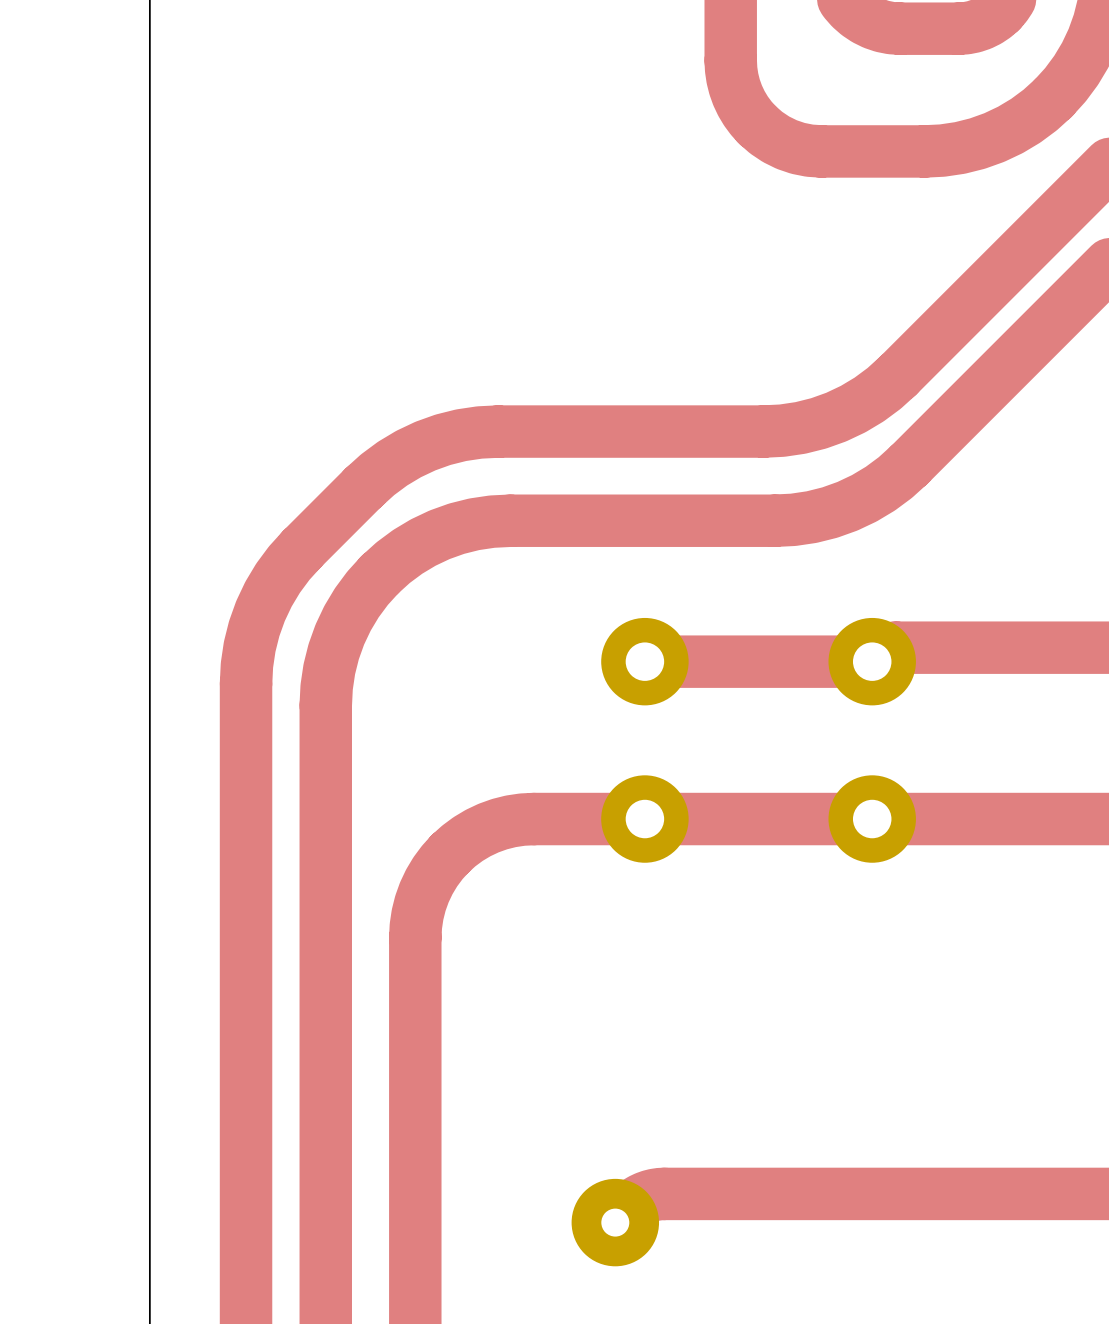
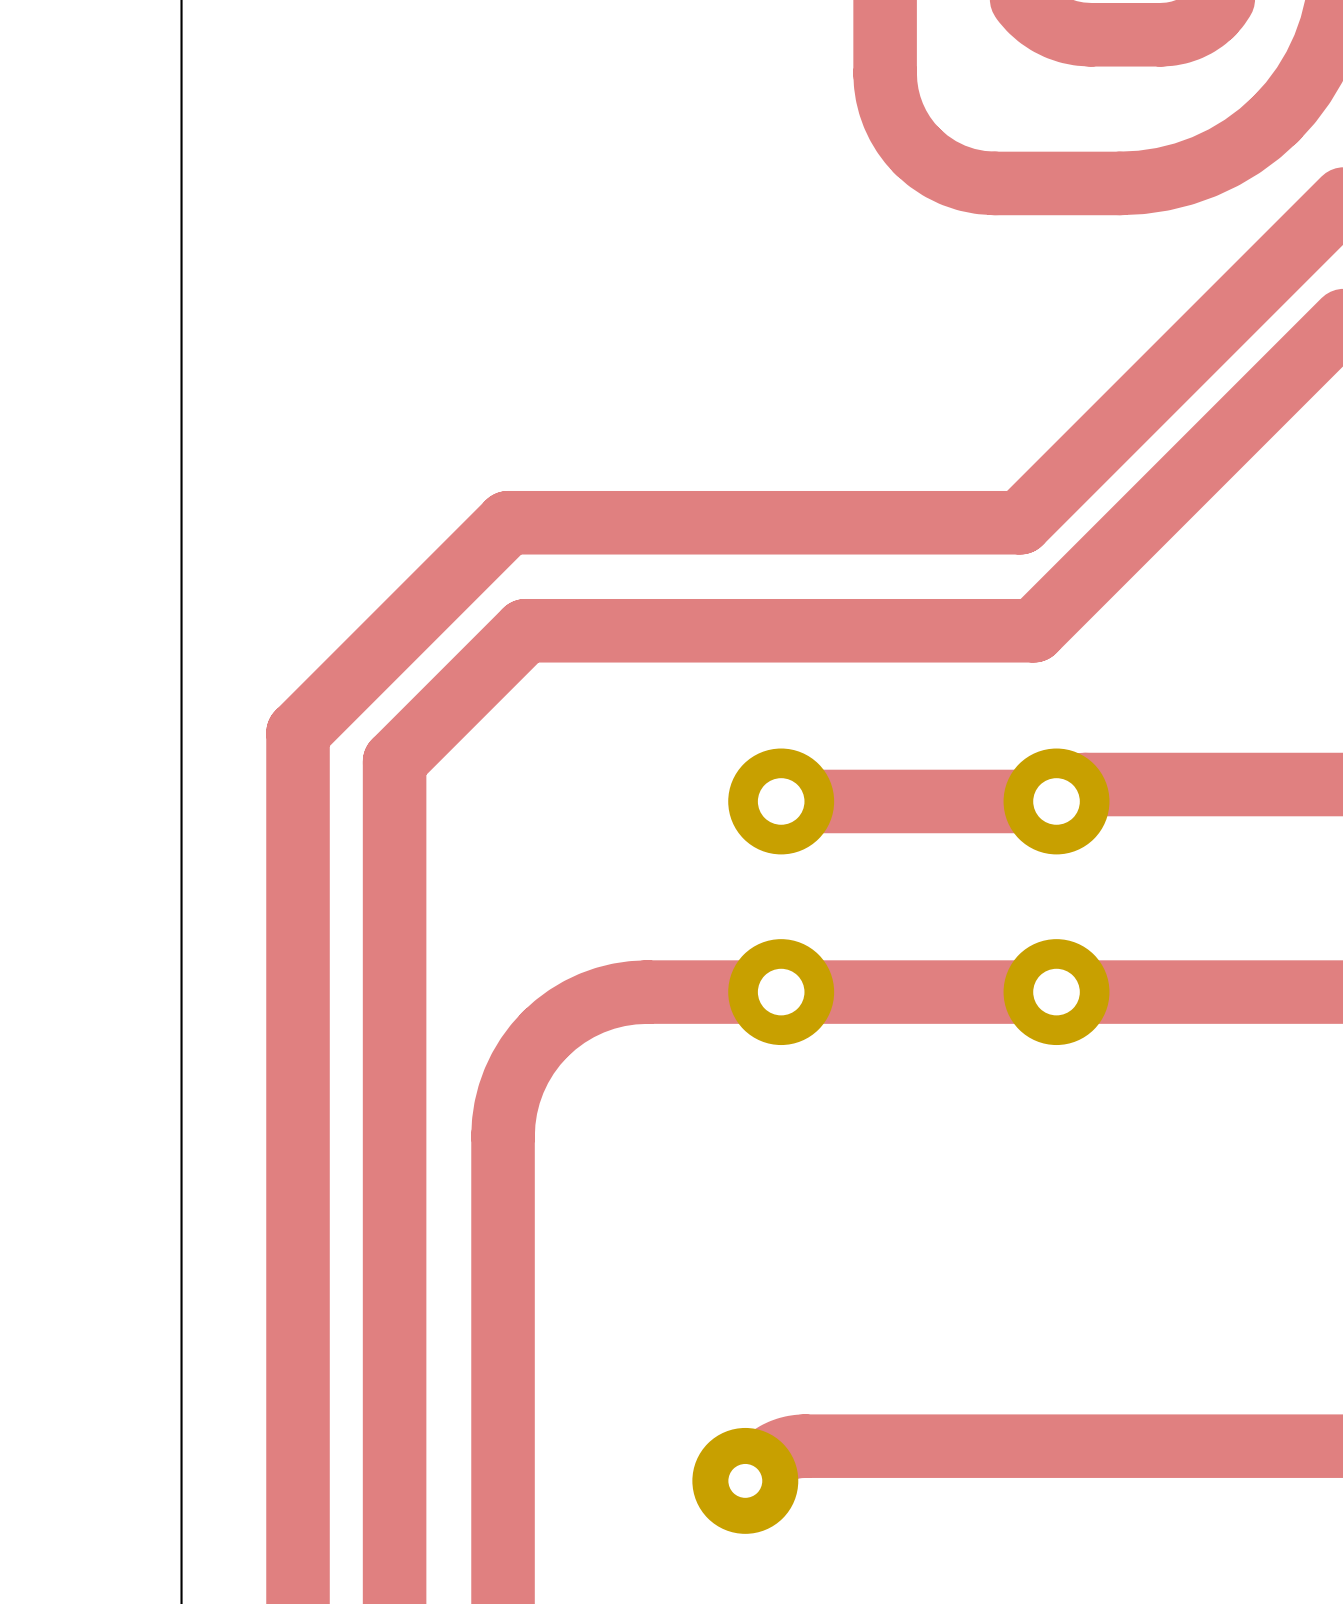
track: (898, 375) (869, 399) (836, 417) (800, 427) (763, 431) -> (1087, 455) (1020, 522) (924, 522)
track: (498, 431) (461, 435) (425, 446) (392, 463) (363, 487) -> (603, 522) (508, 522) (440, 590)
track: (909, 465) (880, 488) (847, 506) (811, 517) (774, 520) -> (1101, 563) (1033, 630) (938, 630)
track: (510, 520) (474, 524) (439, 534) (407, 551) (379, 574) (356, 602) (339, 634) (329, 669) (325, 705) -> (618, 630) (525, 630) (394, 761) (394, 854)
track: (301, 549) (278, 578) (260, 611) (249, 646) (246, 683) -> (365, 665) (298, 732) (298, 828)

